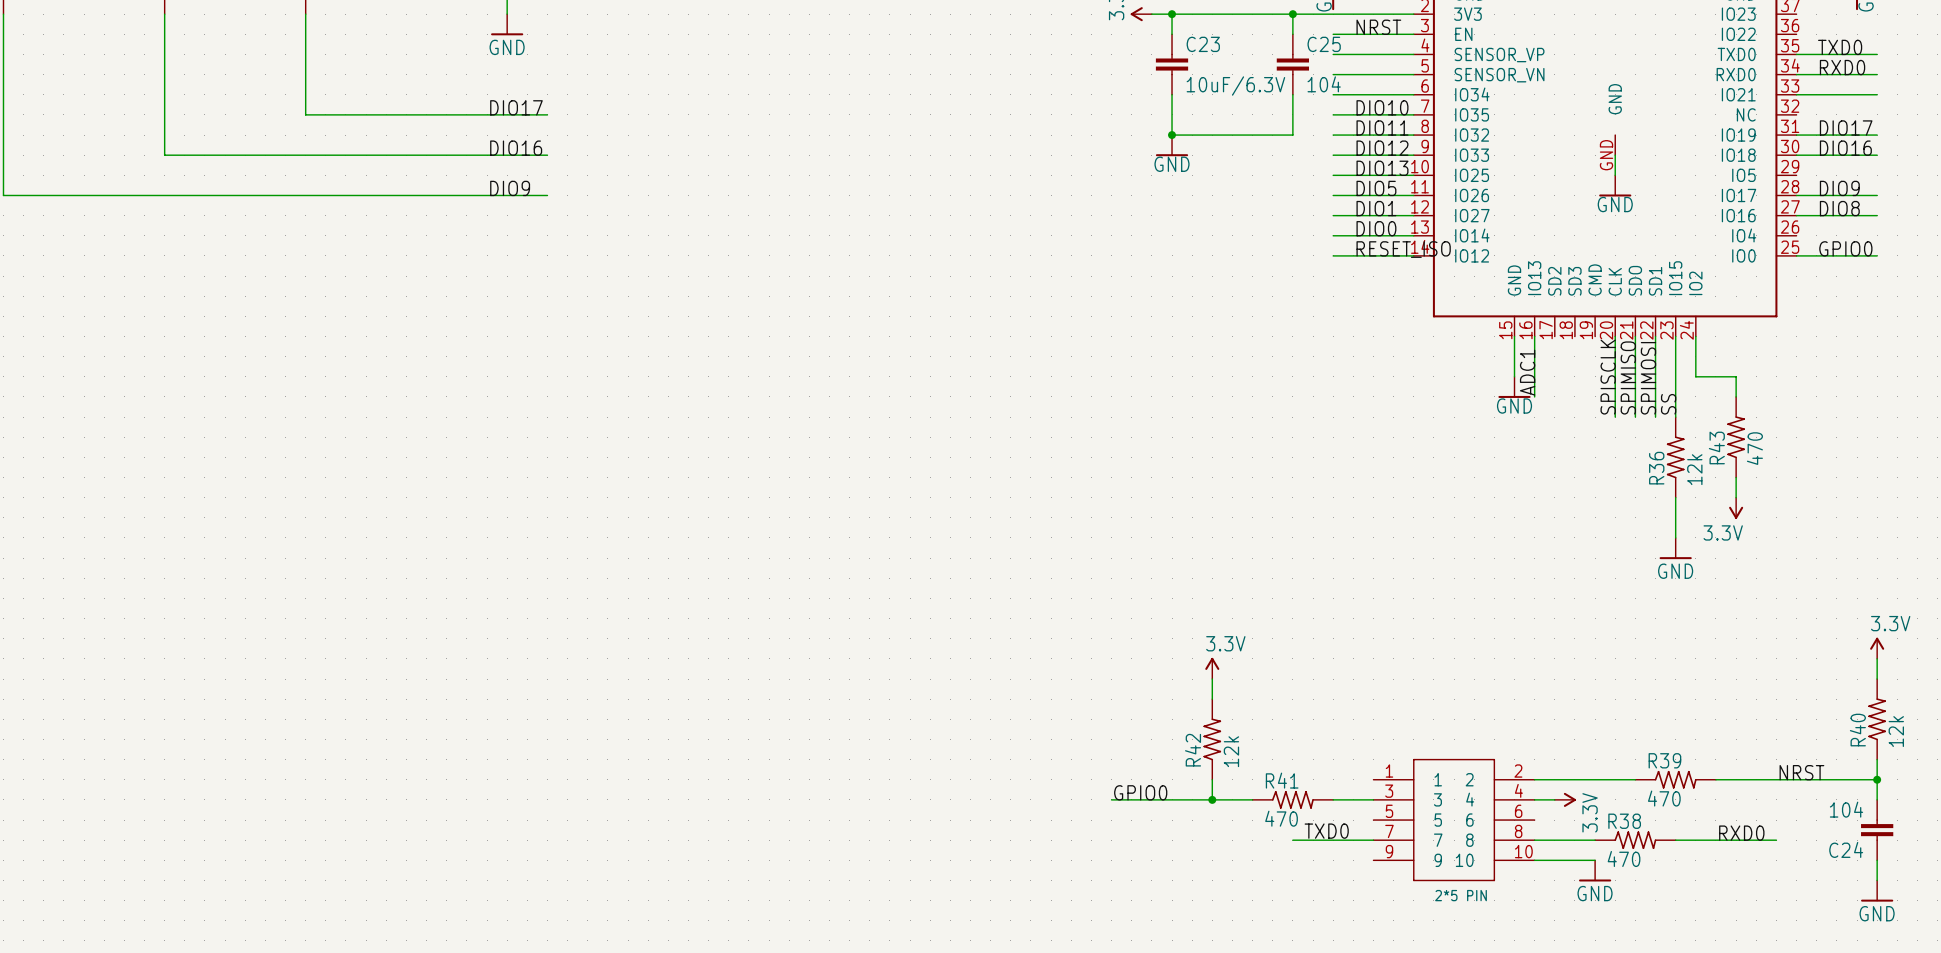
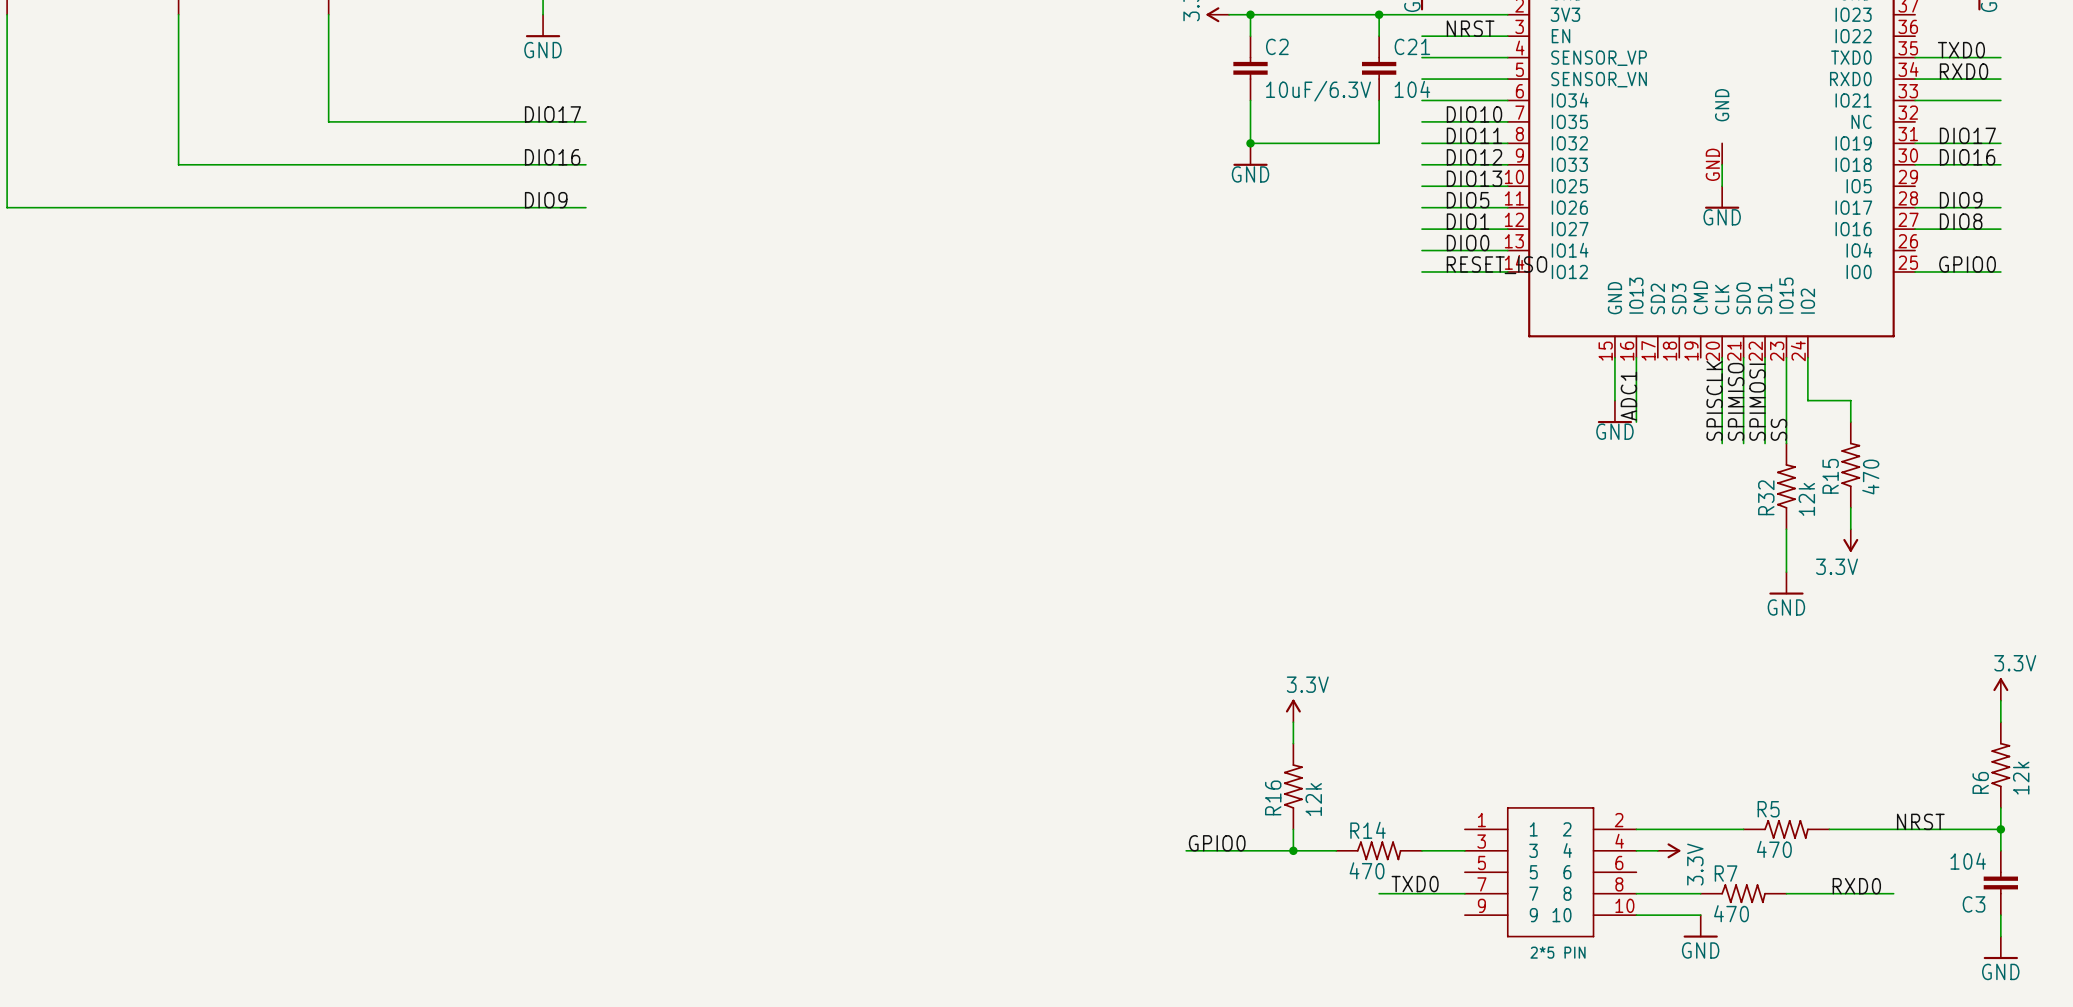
C23 name: C23 (1203, 44) -> C2 (1277, 46)
C25 name: C25 (1324, 44) -> C21 (1412, 46)
R43 name: R43 (1716, 447) -> R15 (1830, 476)
R36 name: R36 (1656, 468) -> R32 (1766, 497)
R40 name: R40 (1857, 730) -> R6 (1980, 782)
R42 name: R42 (1193, 750) -> R16 (1273, 797)
R39 name: R39 (1664, 760) -> R5 (1768, 809)
R41 name: R41 (1282, 780) -> R14 (1368, 830)
R38 name: R38 (1624, 821) -> R7 (1726, 873)
C24 name: C24 (1846, 849) -> C3 (1974, 904)

